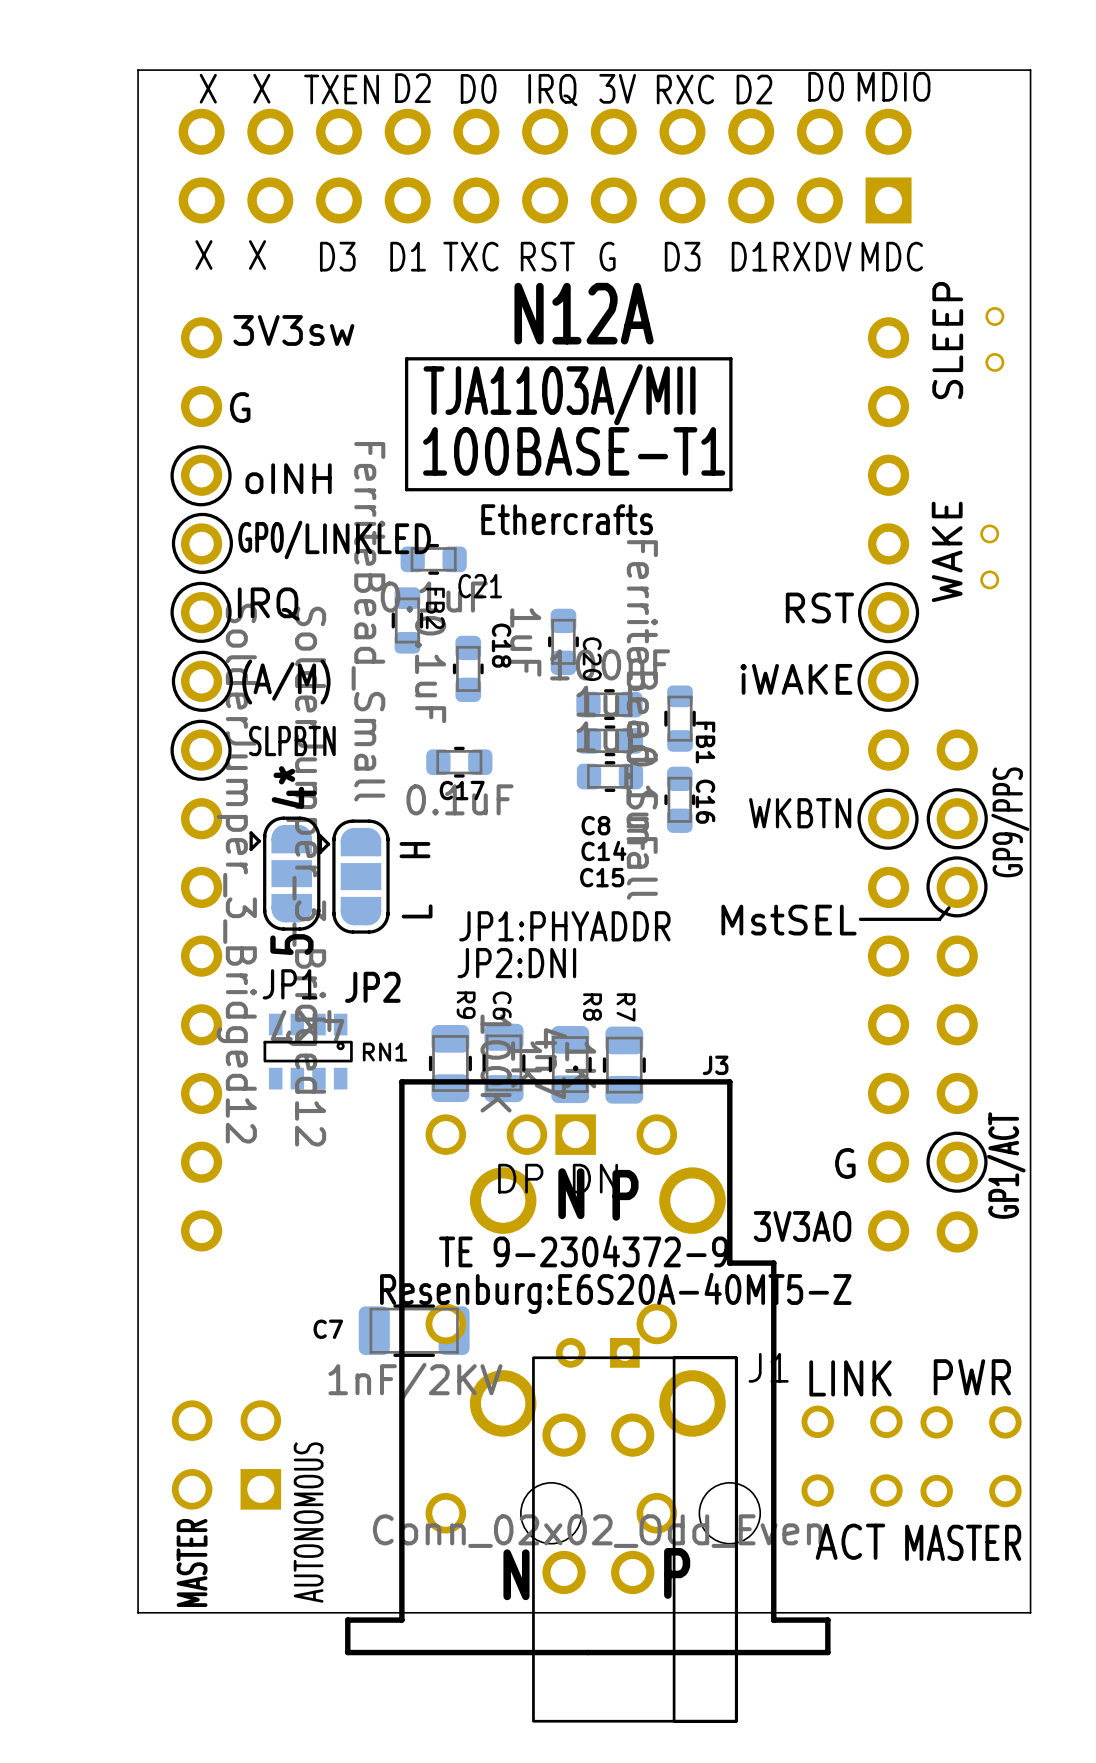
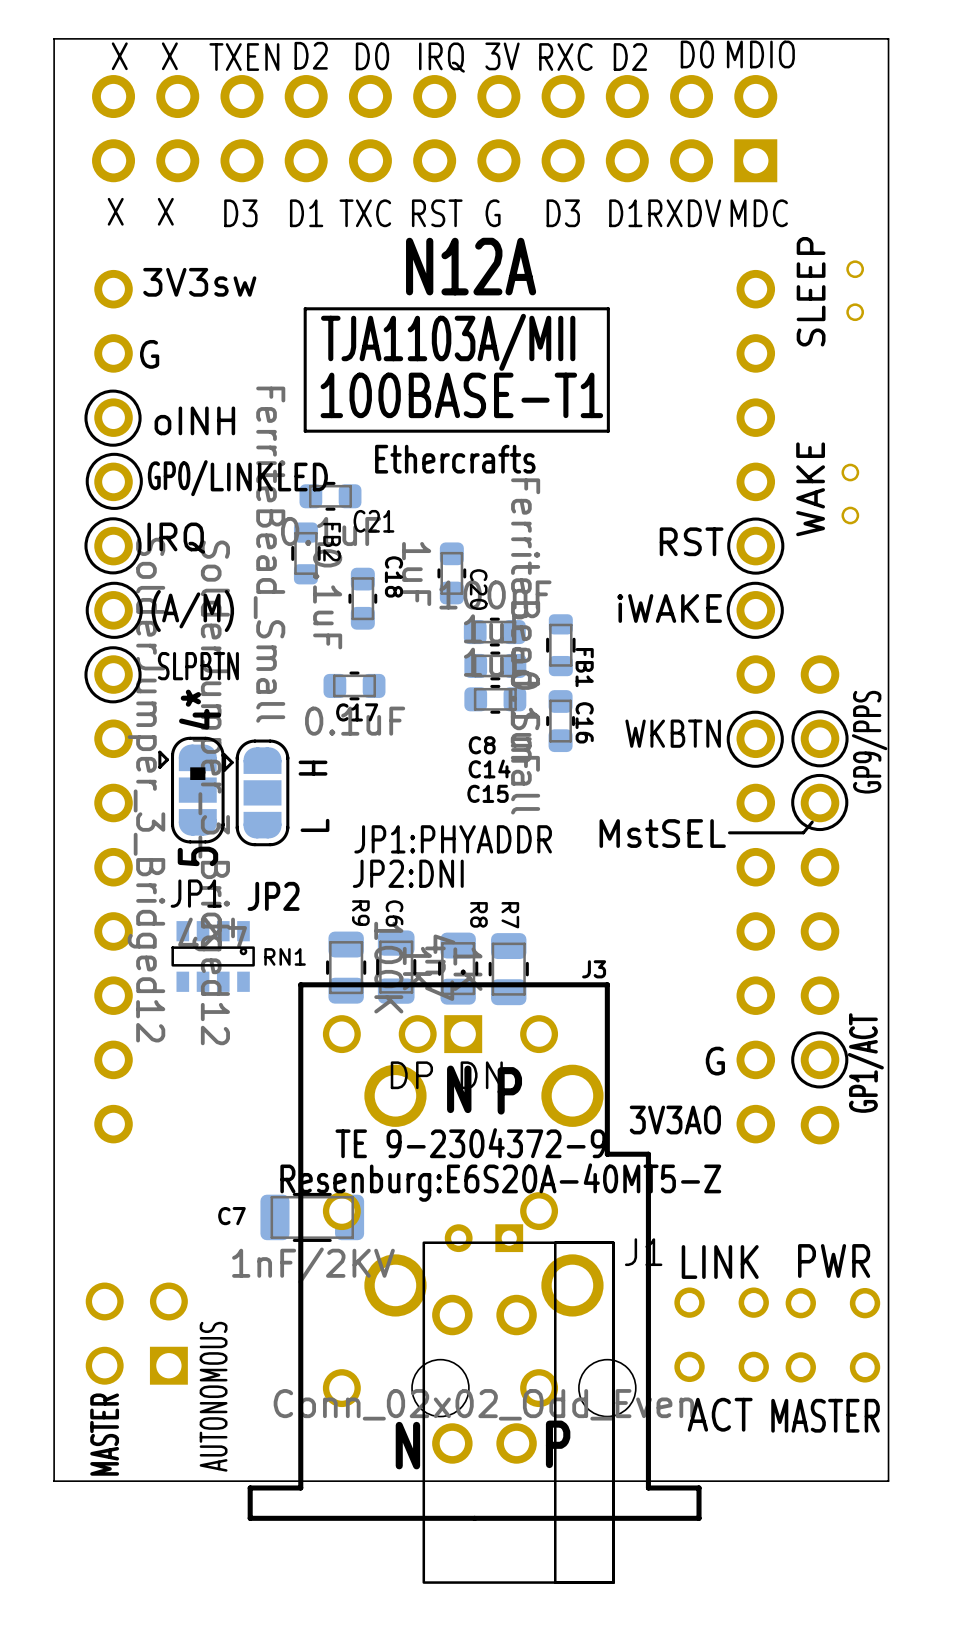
JP1 footprint: [249, 816, 321, 931] -> [158, 736, 225, 844]

